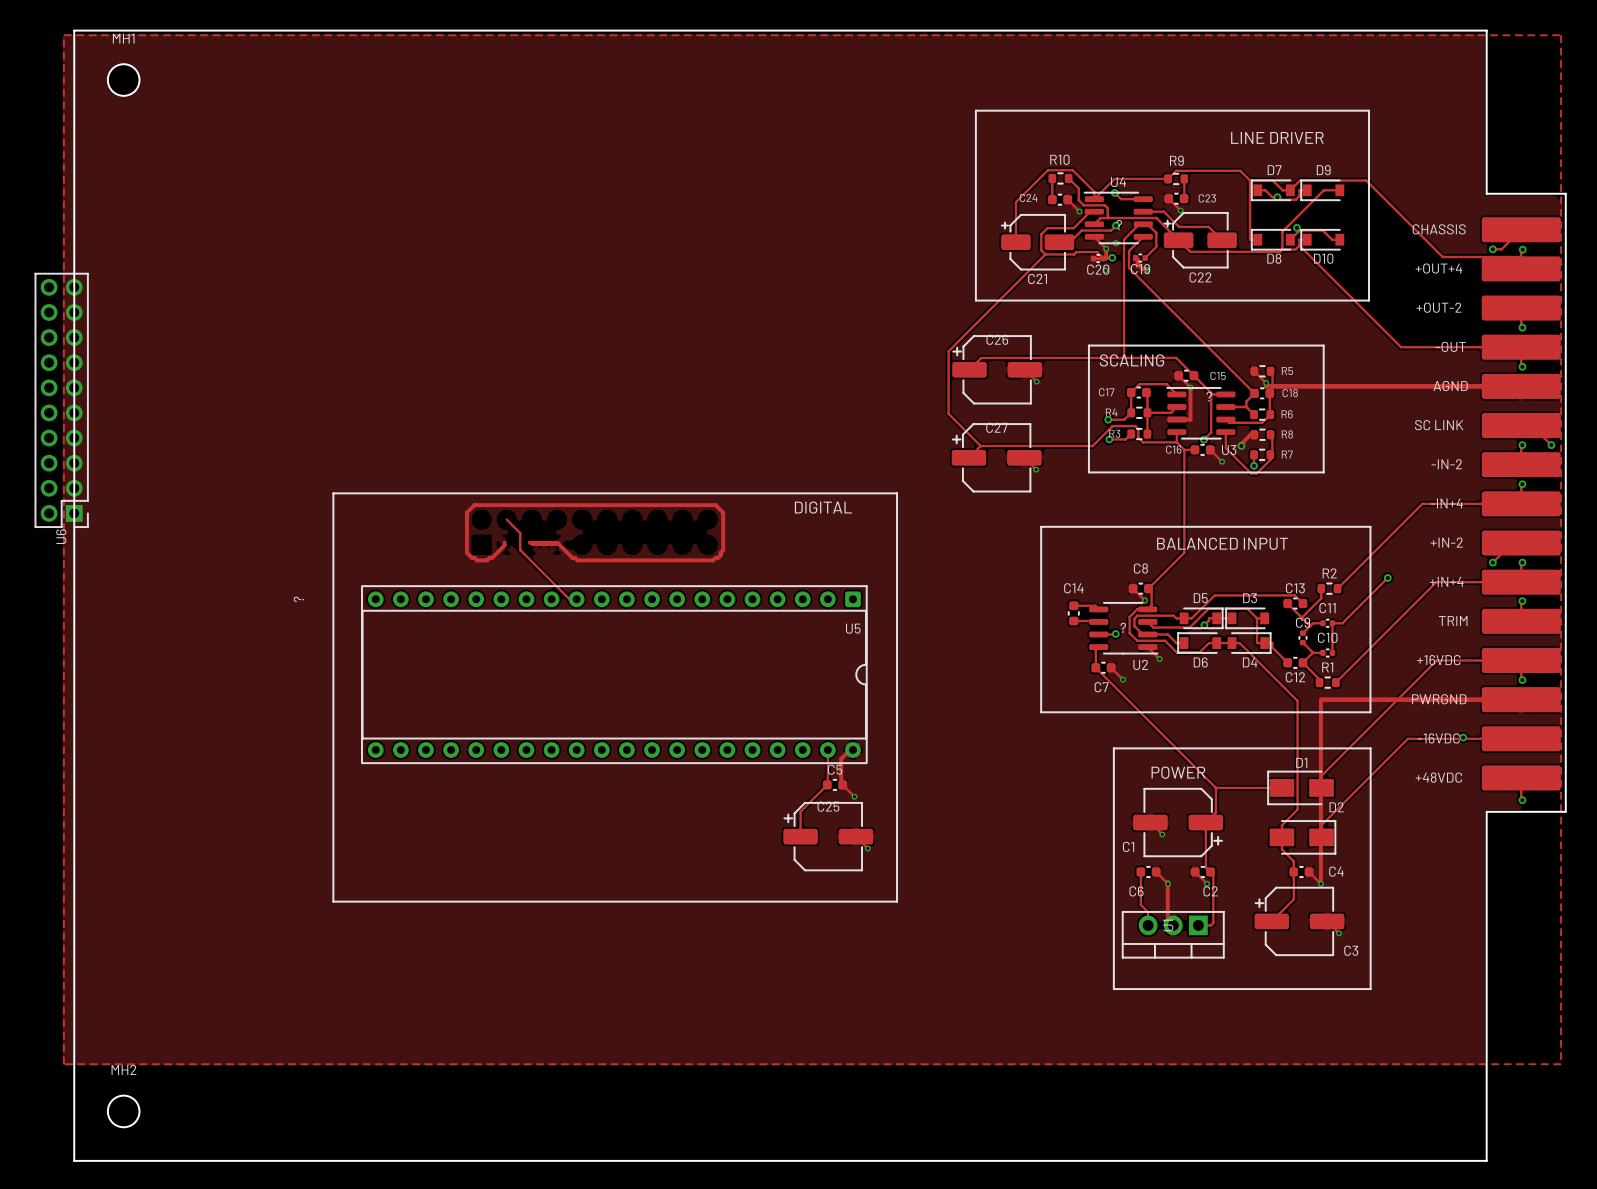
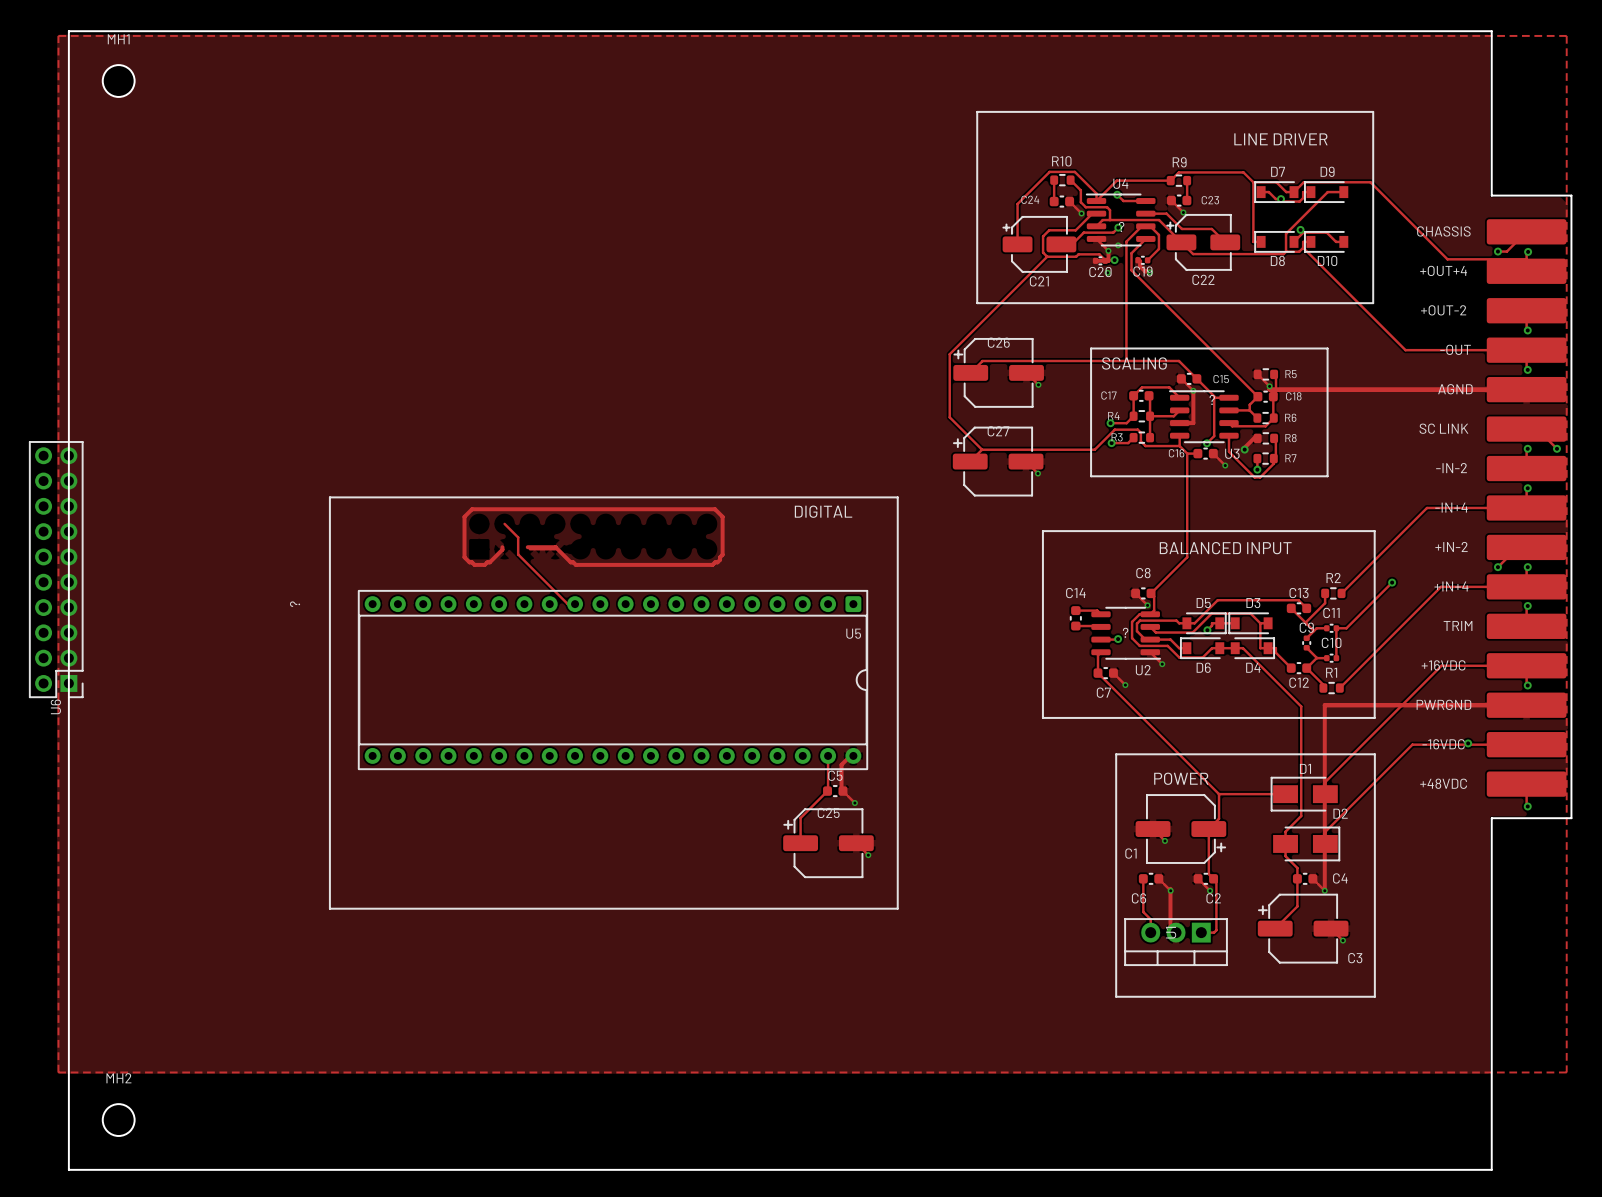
U6 position: (61, 400) -> (56, 569)

